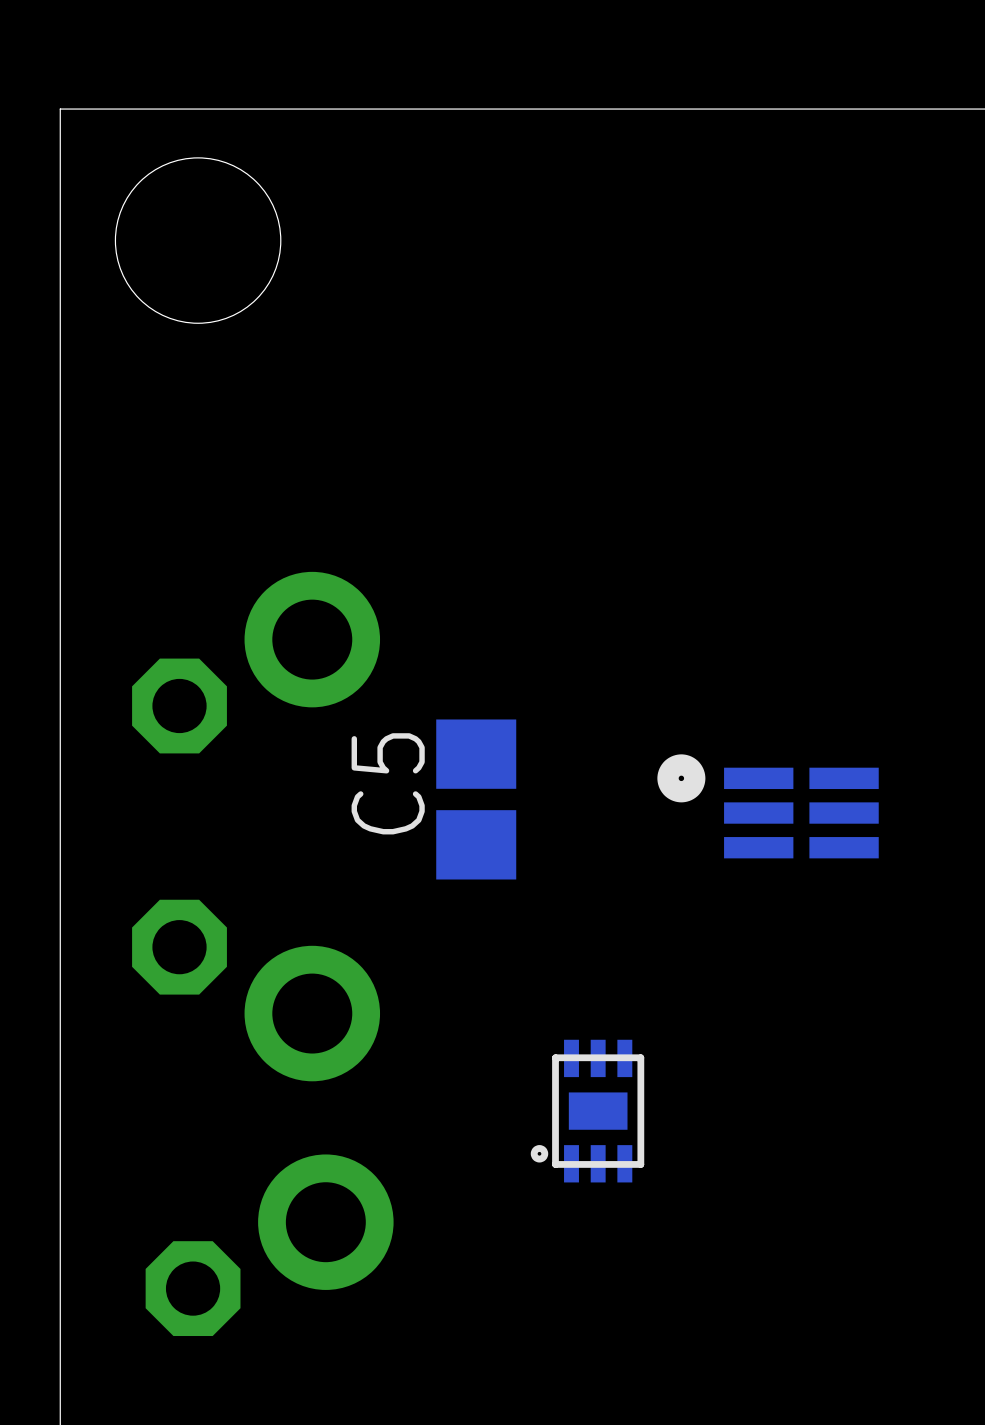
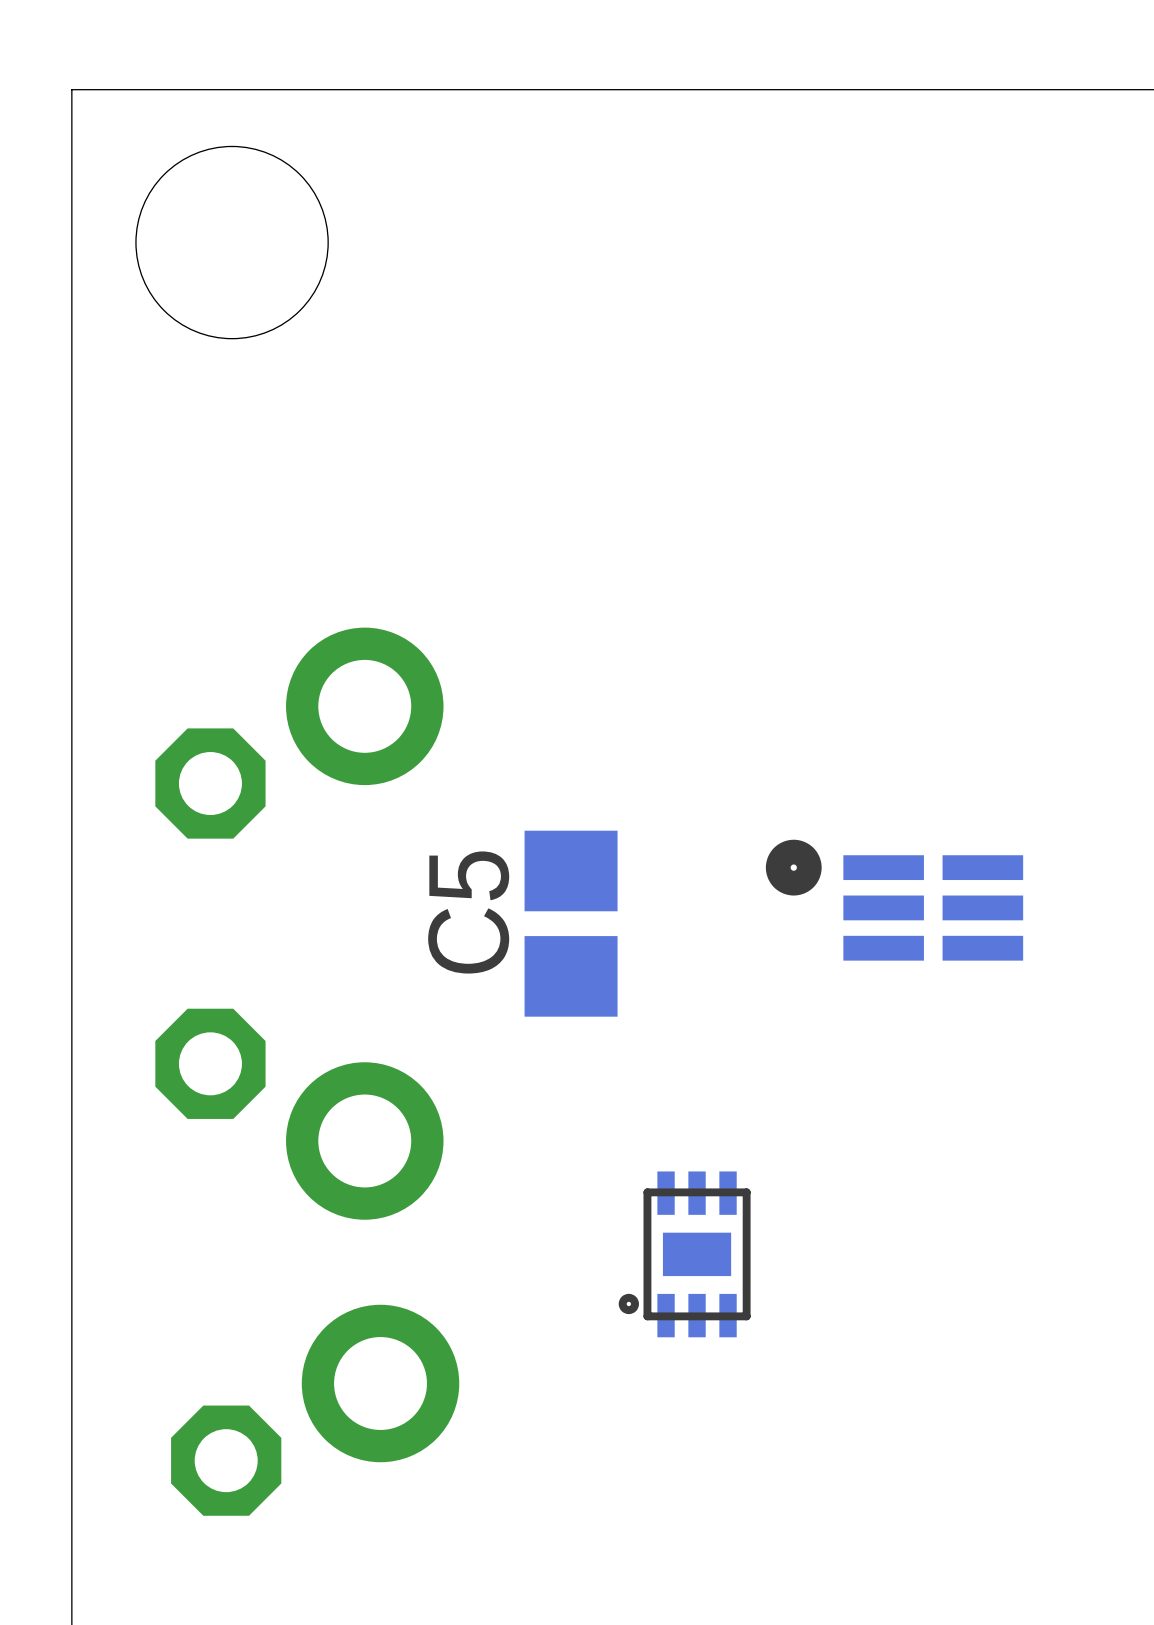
C5 position: (476, 799) -> (571, 923)

